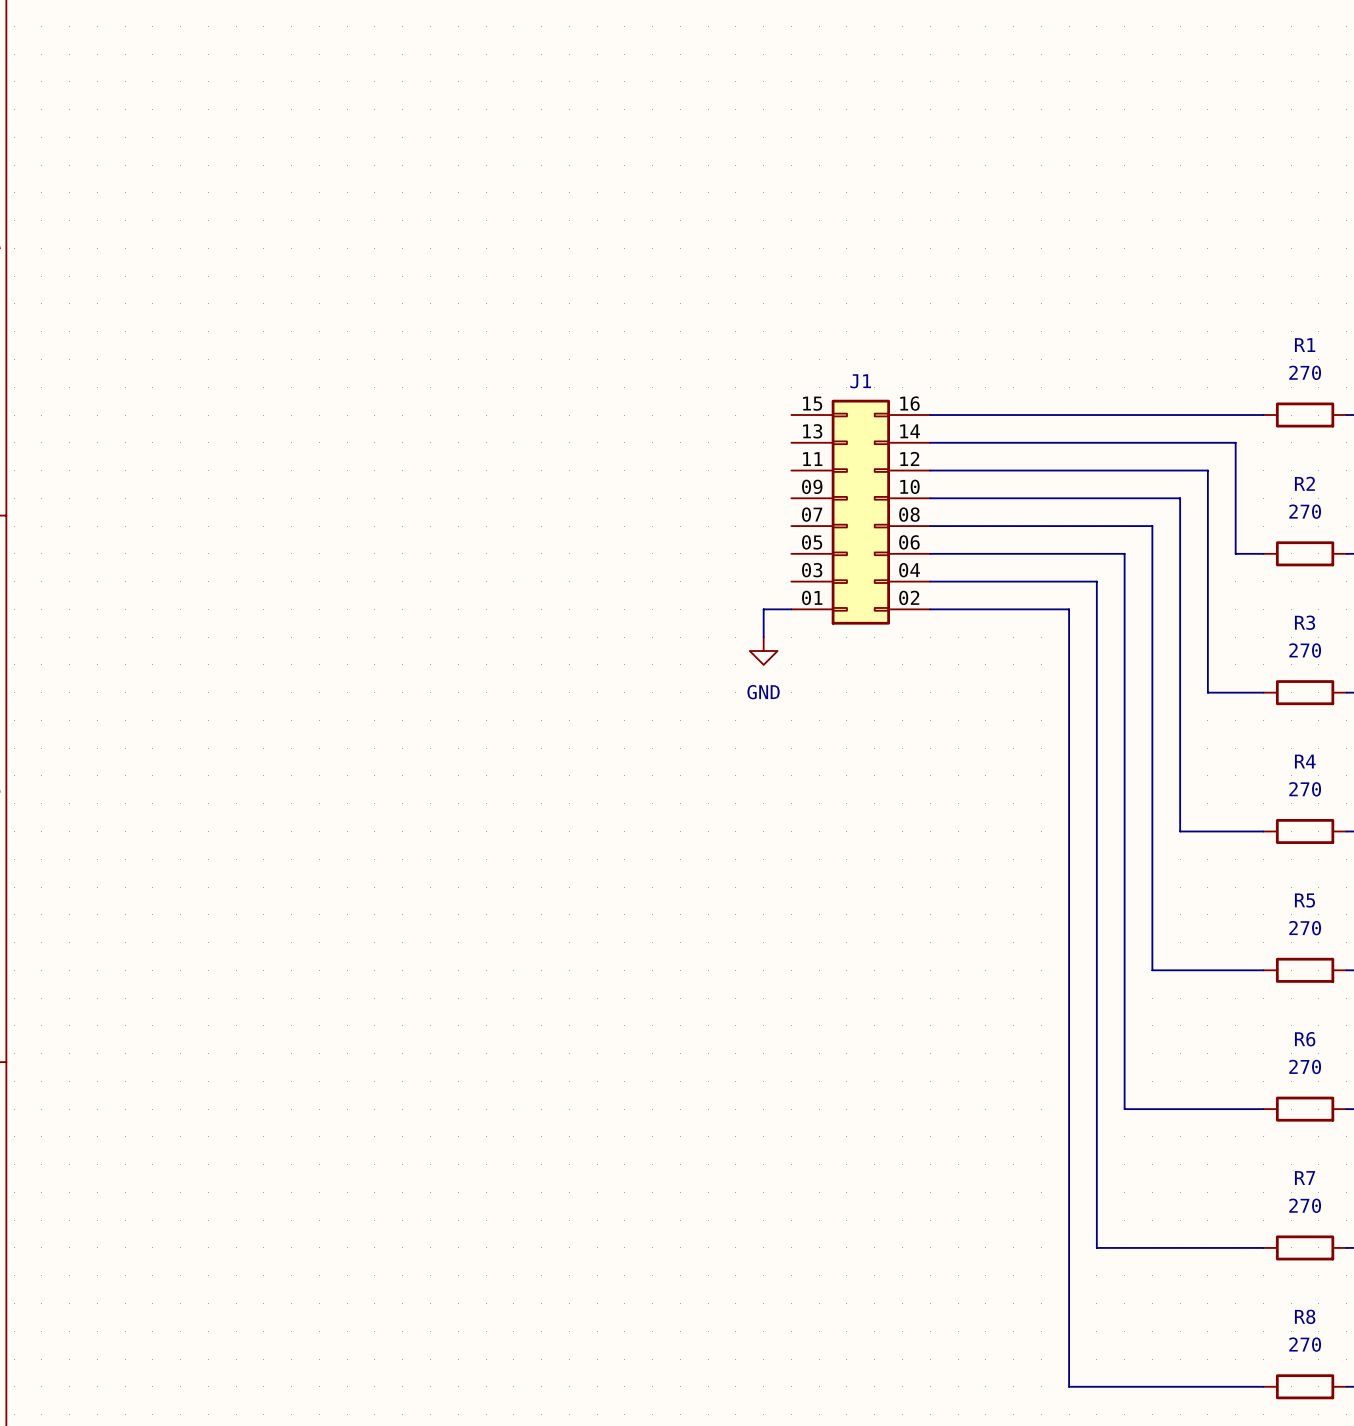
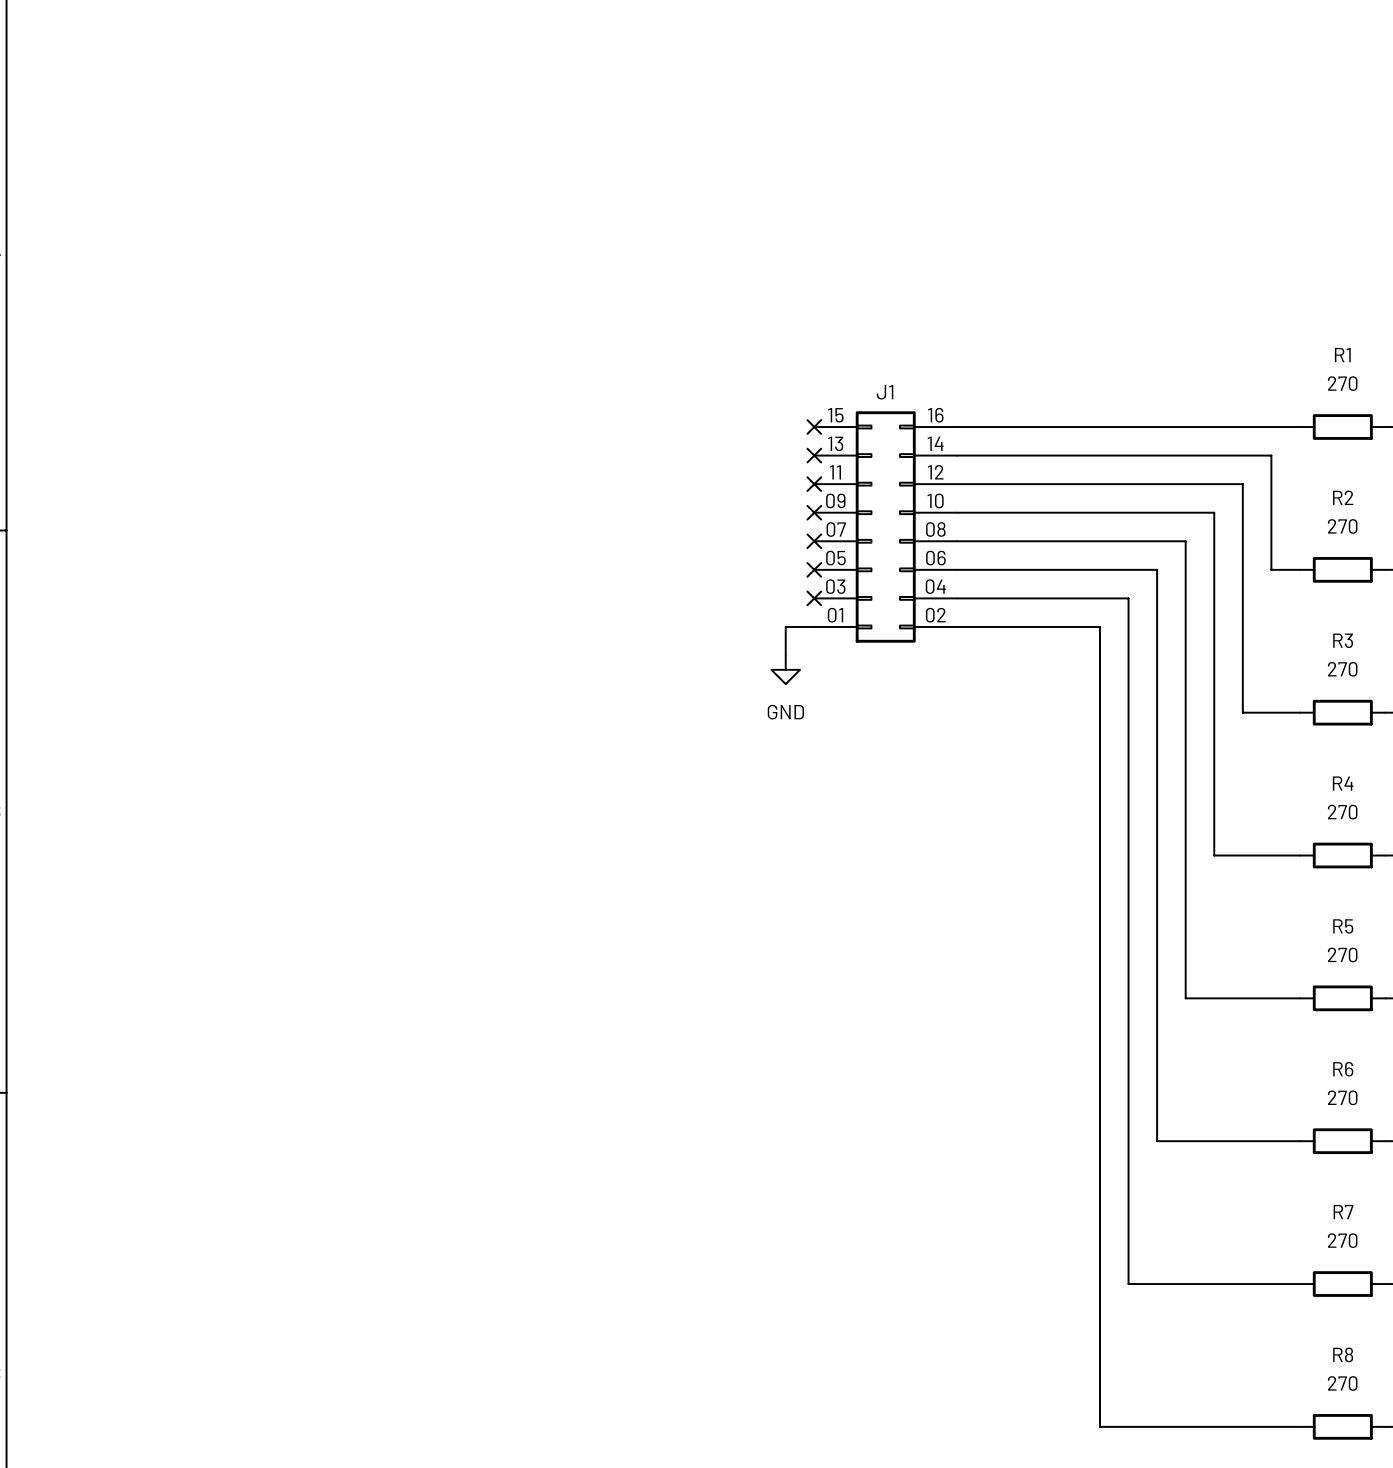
no-connect mark: none -> (814, 427)
no-connect mark: none -> (814, 455)
no-connect mark: none -> (814, 484)
no-connect mark: none -> (814, 512)
no-connect mark: none -> (814, 541)
no-connect mark: none -> (814, 569)
no-connect mark: none -> (814, 598)

